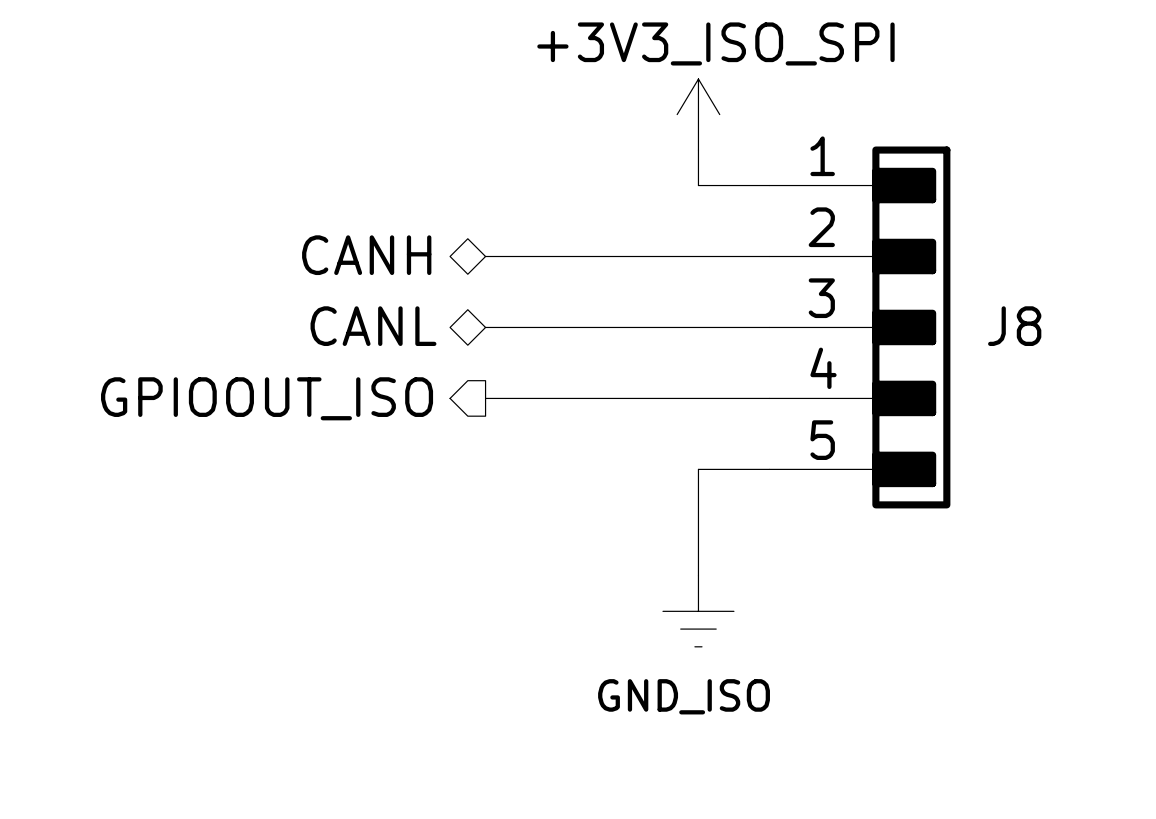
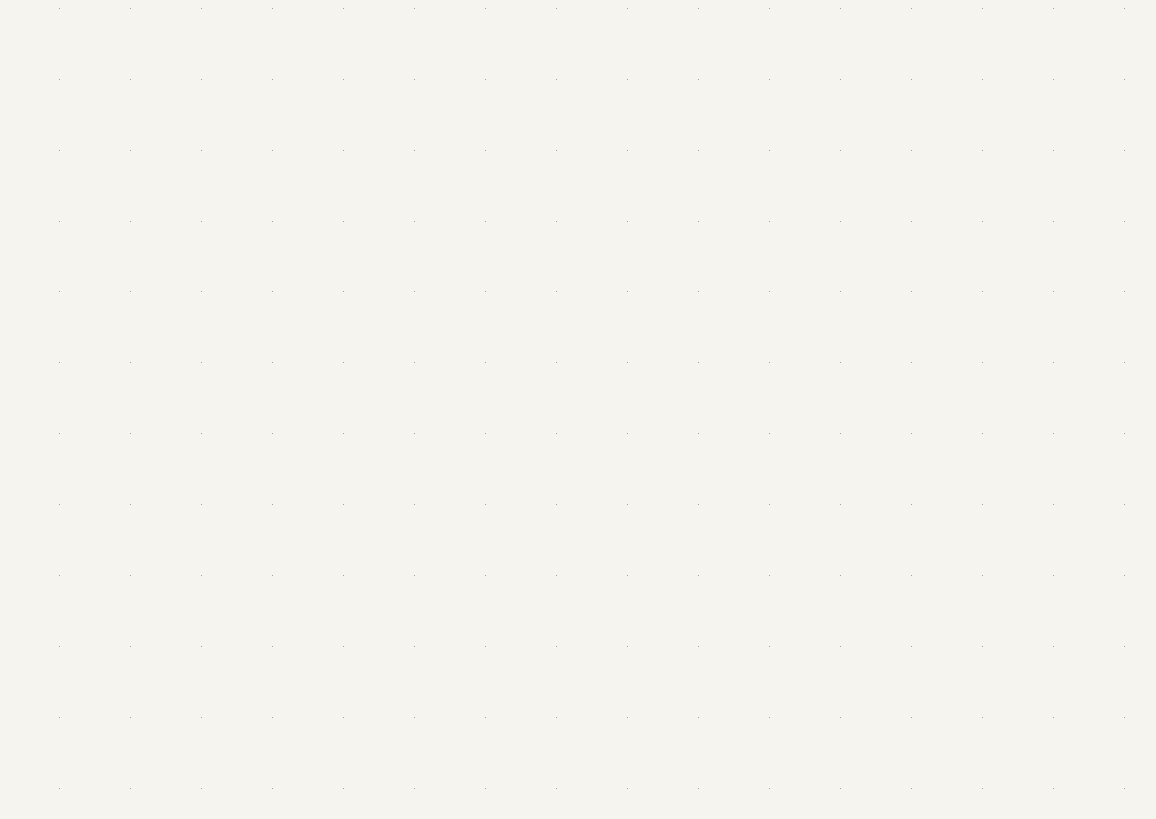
power symbol: +3V3_ISO_SPI (698, 114) -> none
wire: (698, 150) (698, 185) (769, 185) -> none
hierarchical label: CANH (366, 255) -> none
wire: (485, 256) (769, 256) -> none
hierarchical label: CANL (373, 326) -> none
wire: (485, 327) (769, 327) -> none
J8: (859, 327) -> none
hierarchical label: GPIOOUT_ISO (267, 398) -> none
wire: (485, 398) (769, 398) -> none
wire: (769, 469) (698, 469) (698, 575) -> none
power symbol: GND_ISO (698, 611) -> none

